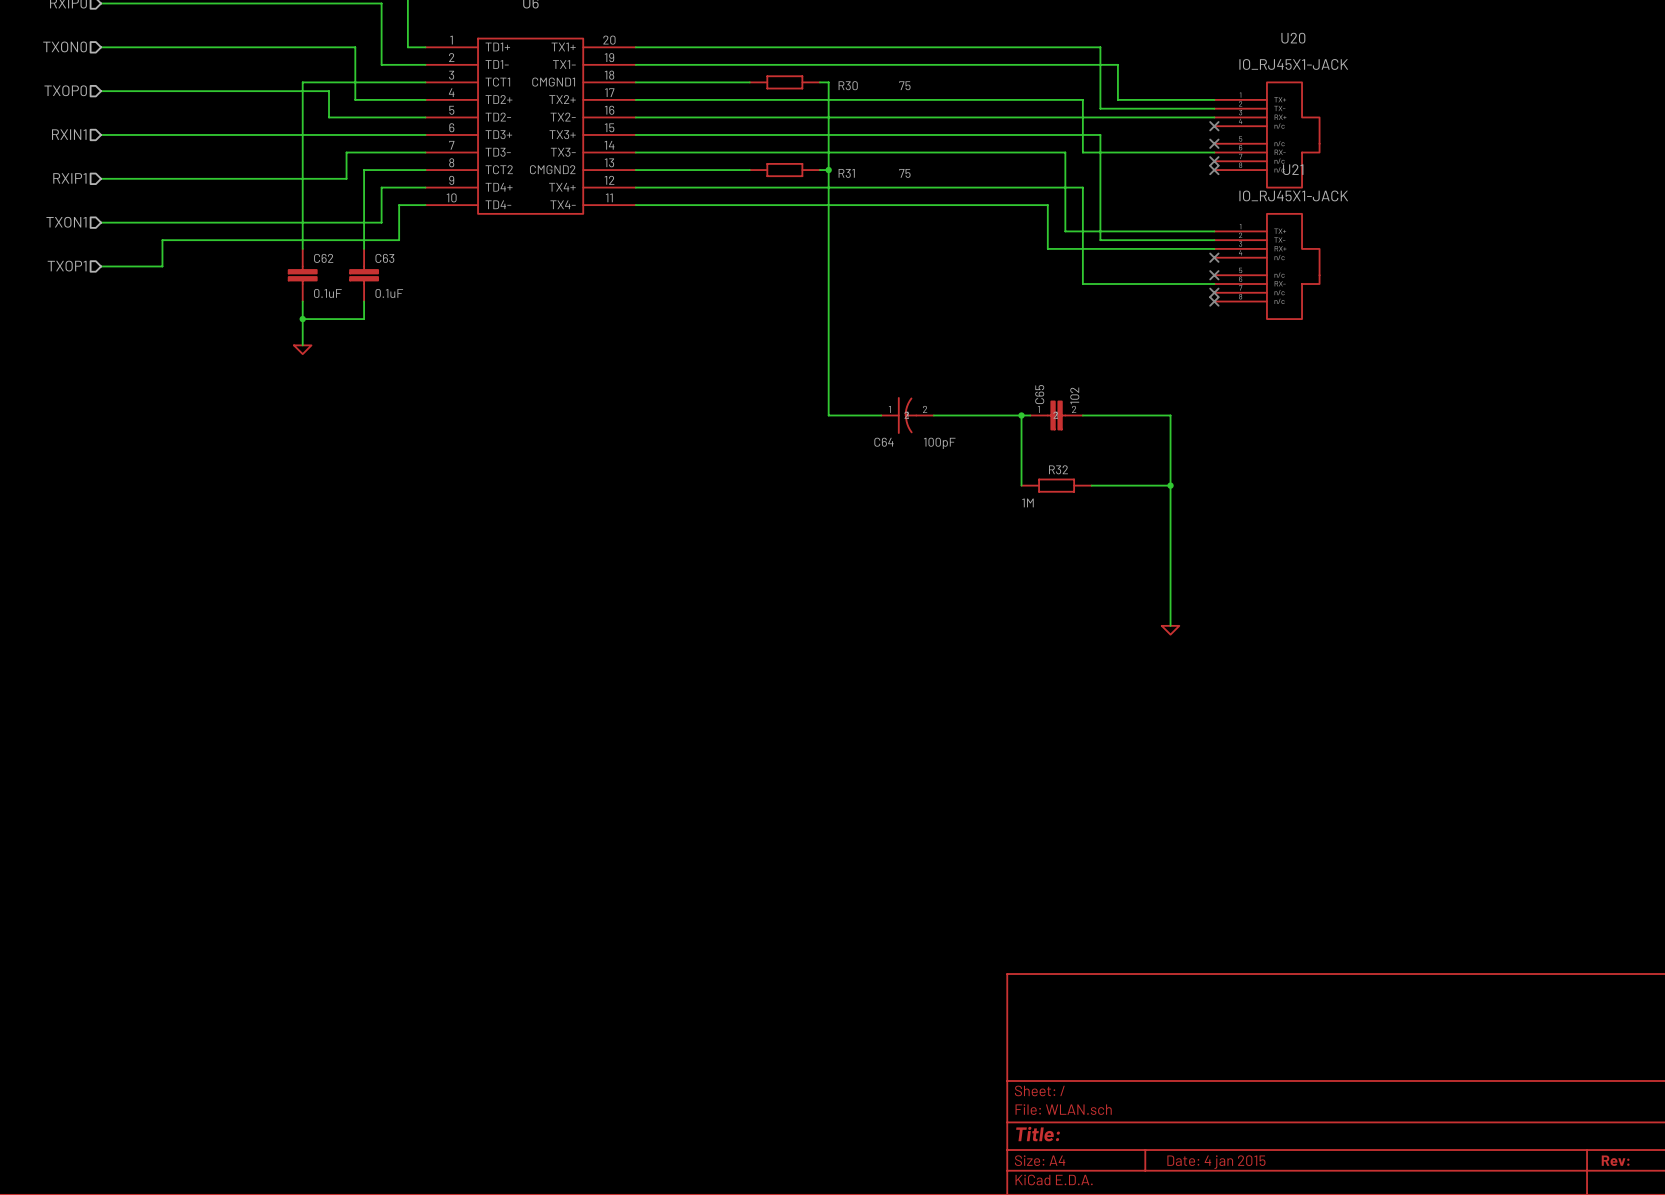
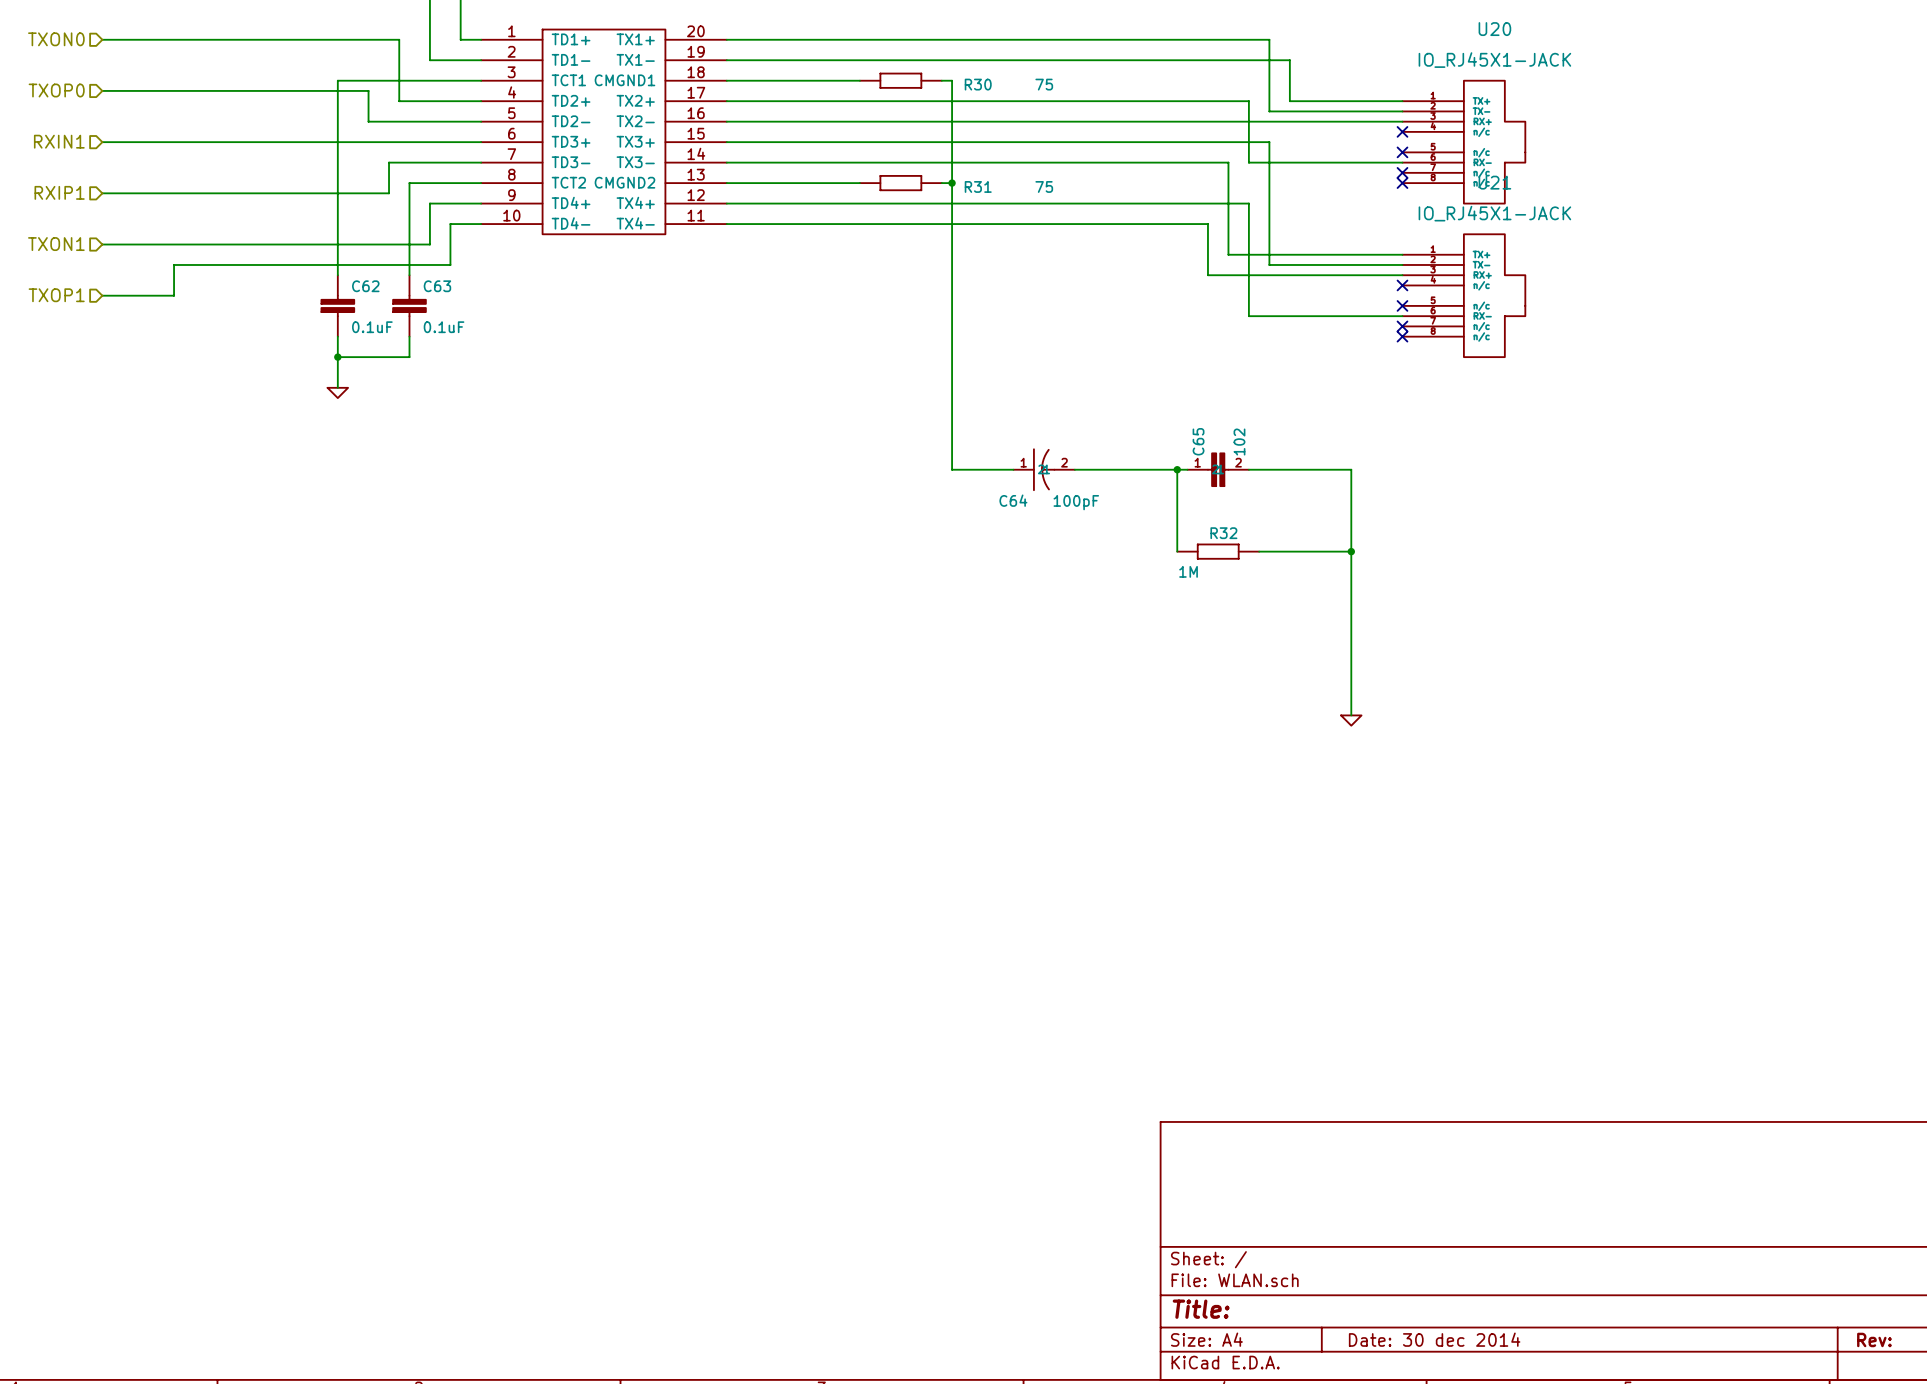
title block: Date: 4 jan 2015 (1216, 1162) -> Date: 30 dec 2014 (1434, 1339)

